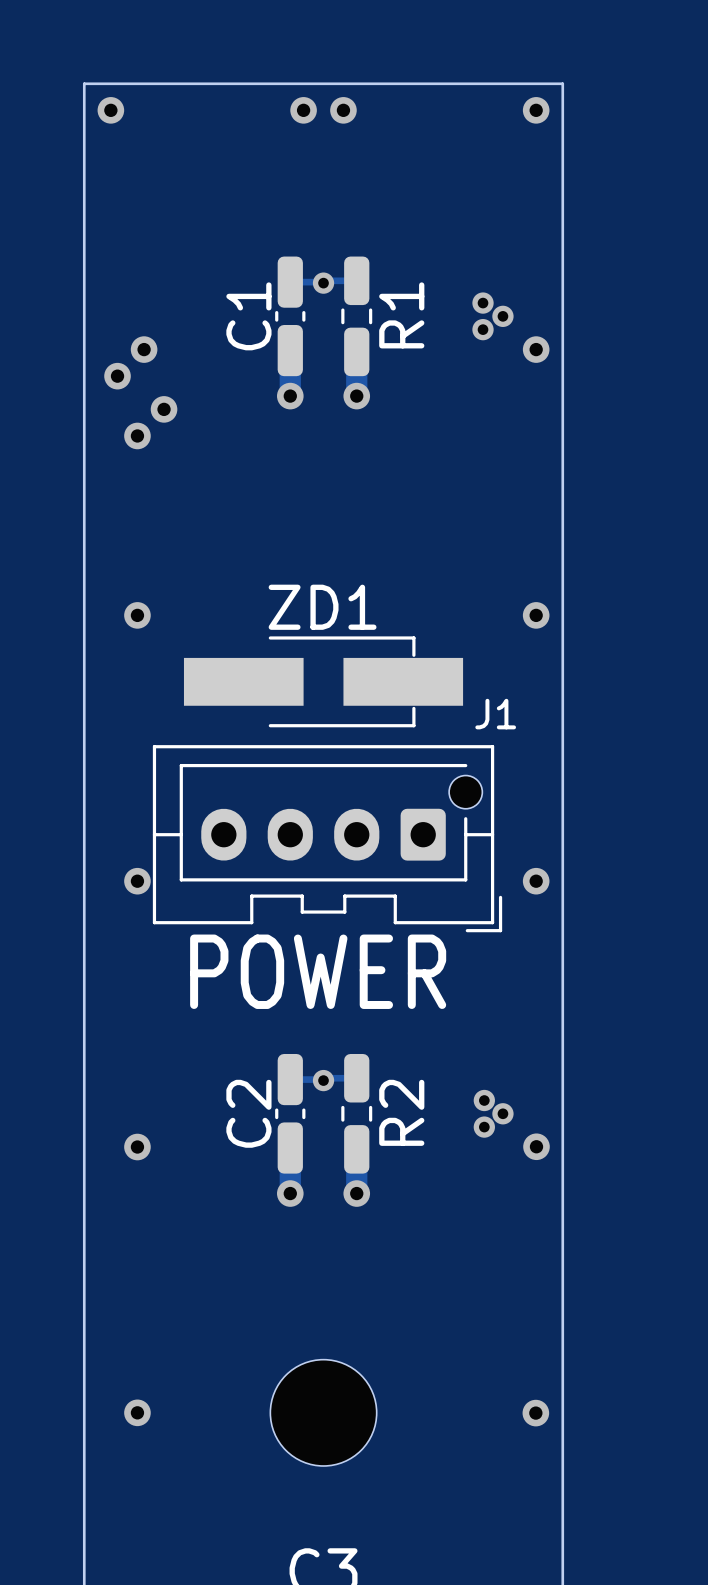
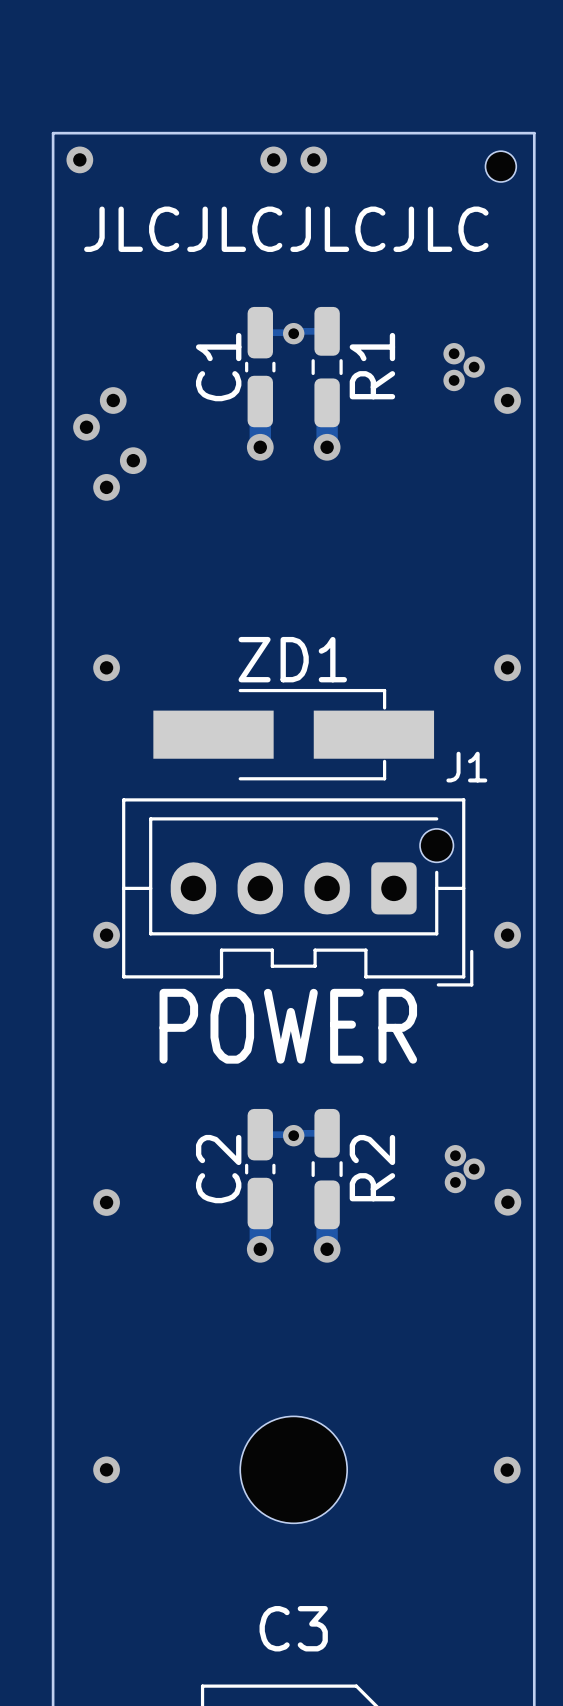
via: (536, 110) -> none
part: none -> (500, 166)
text: none -> JLCJLCJLCJLC (286, 229)

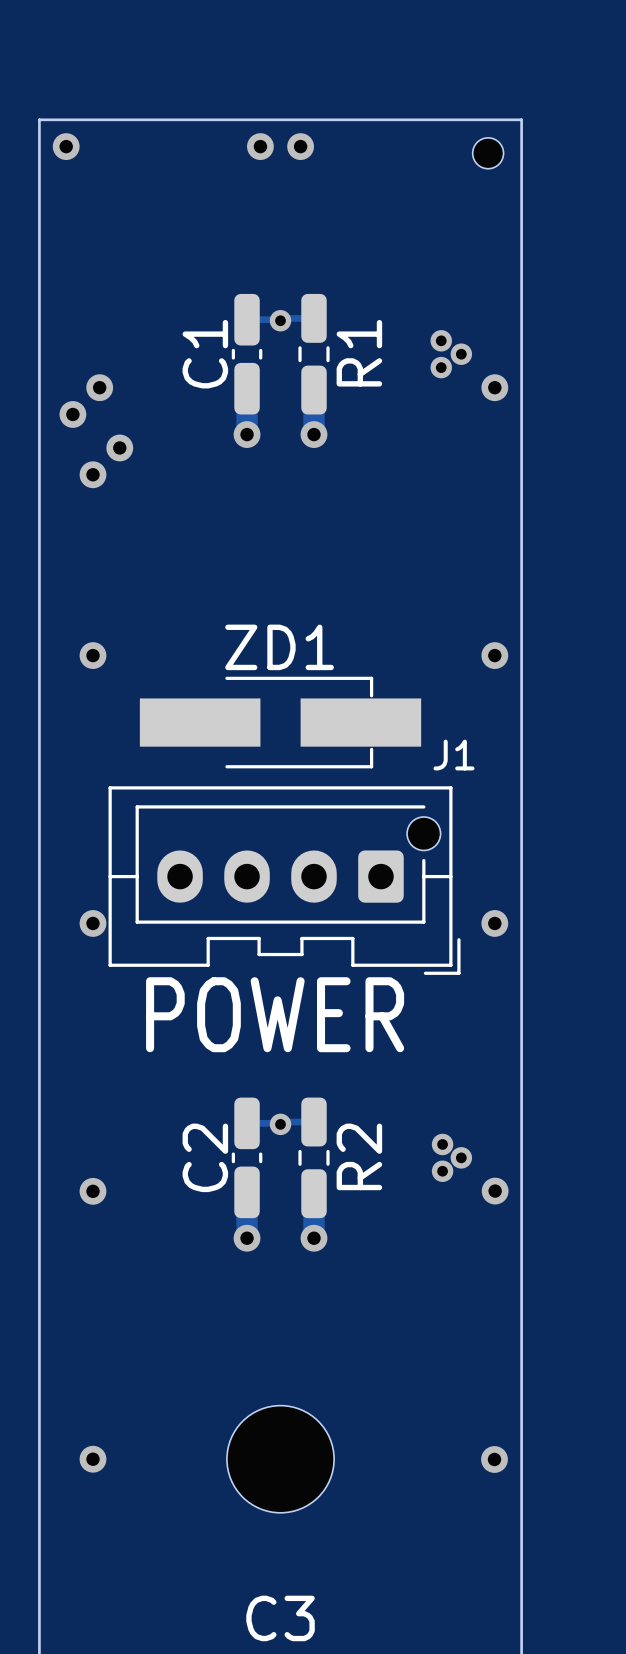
text: JLCJLCJLCJLC (286, 229) -> none

